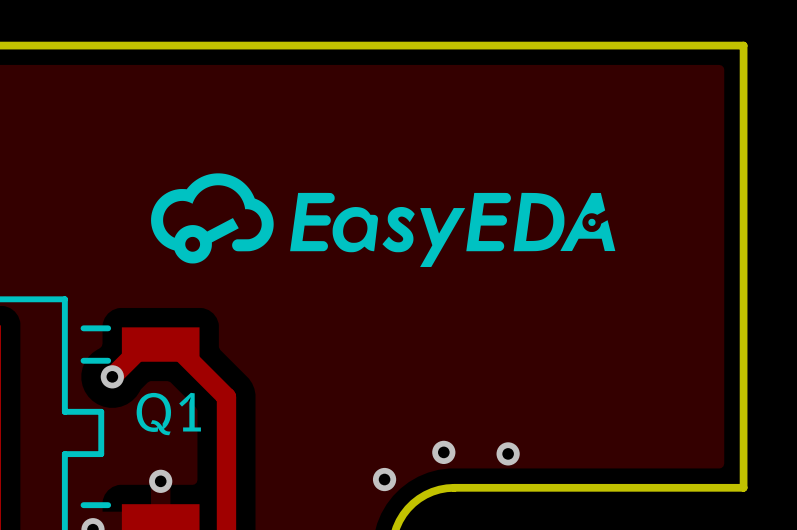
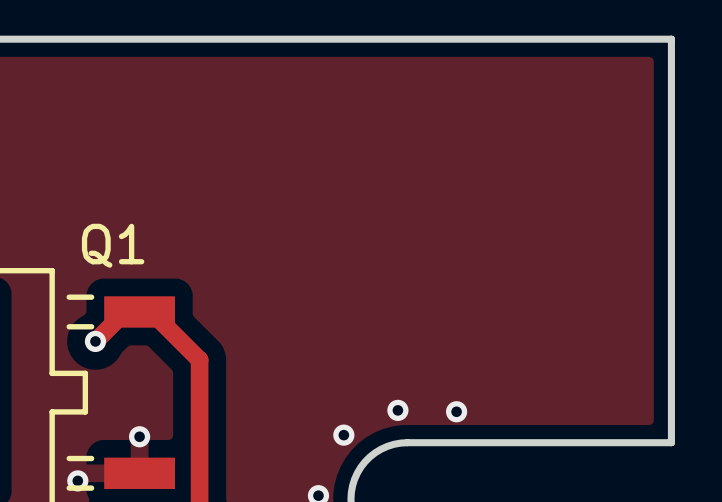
drawing: [151, 173, 616, 268] -> none
Q1 name position: Q1 (168, 414) -> Q1 (113, 245)

